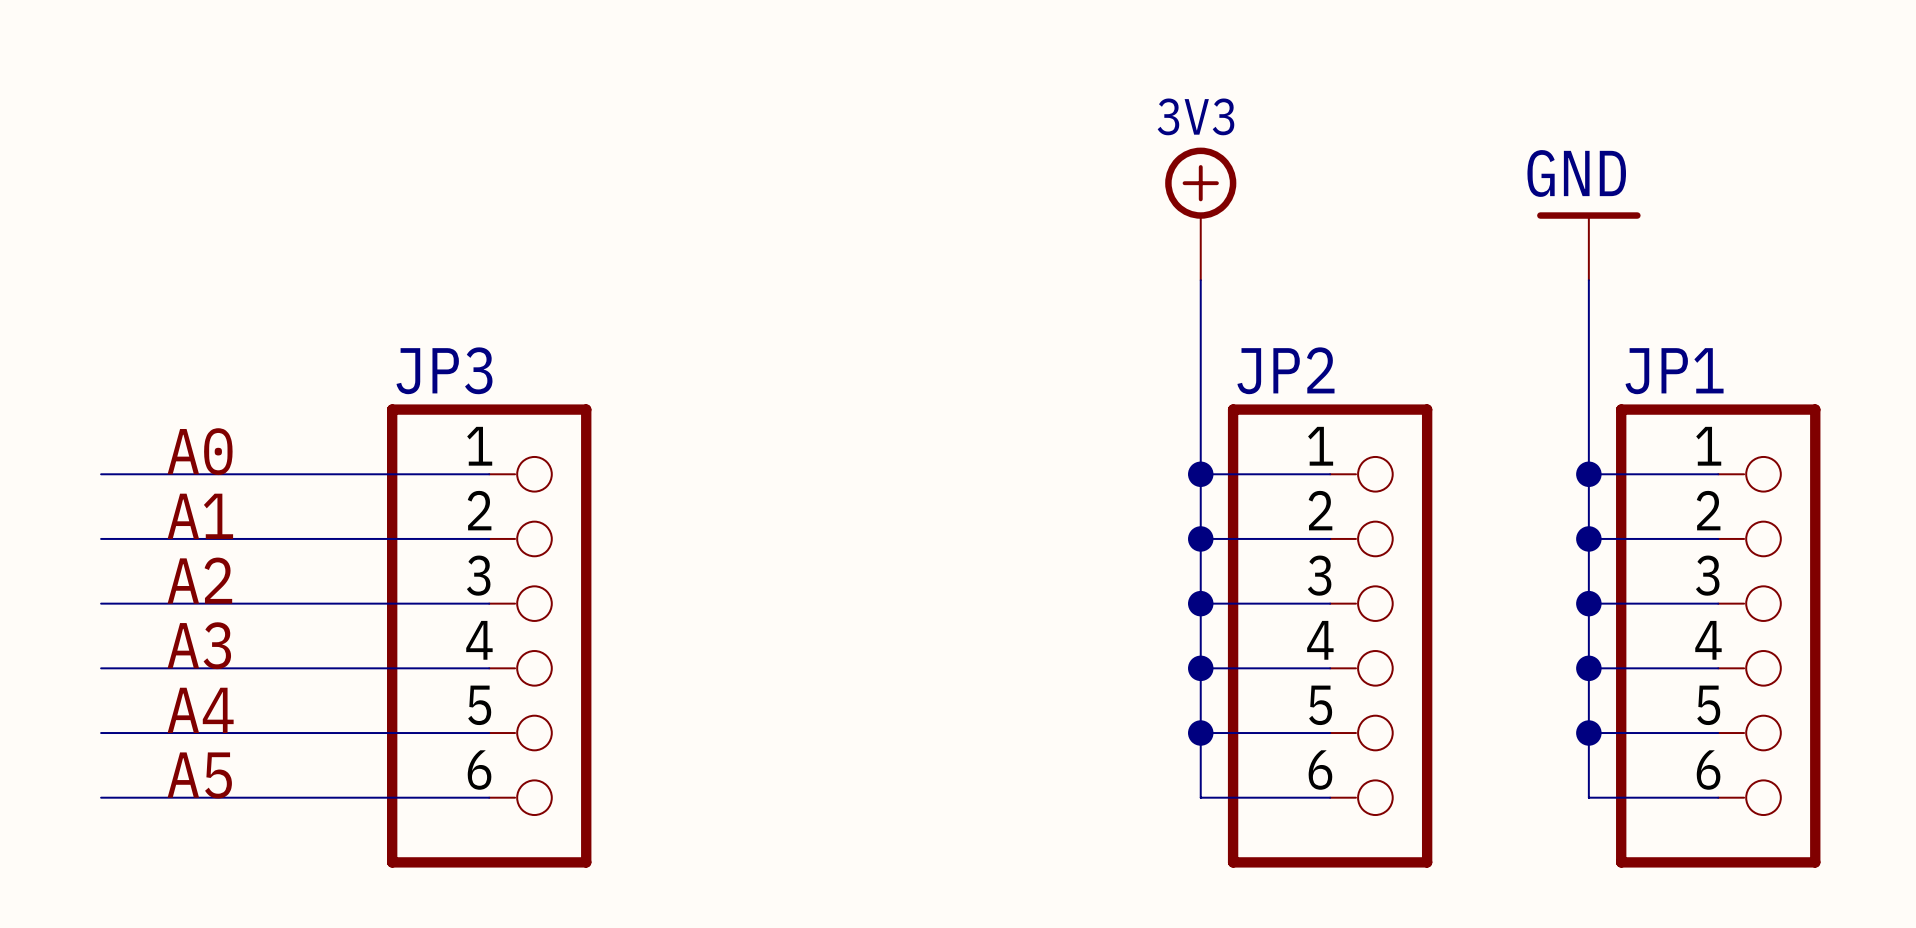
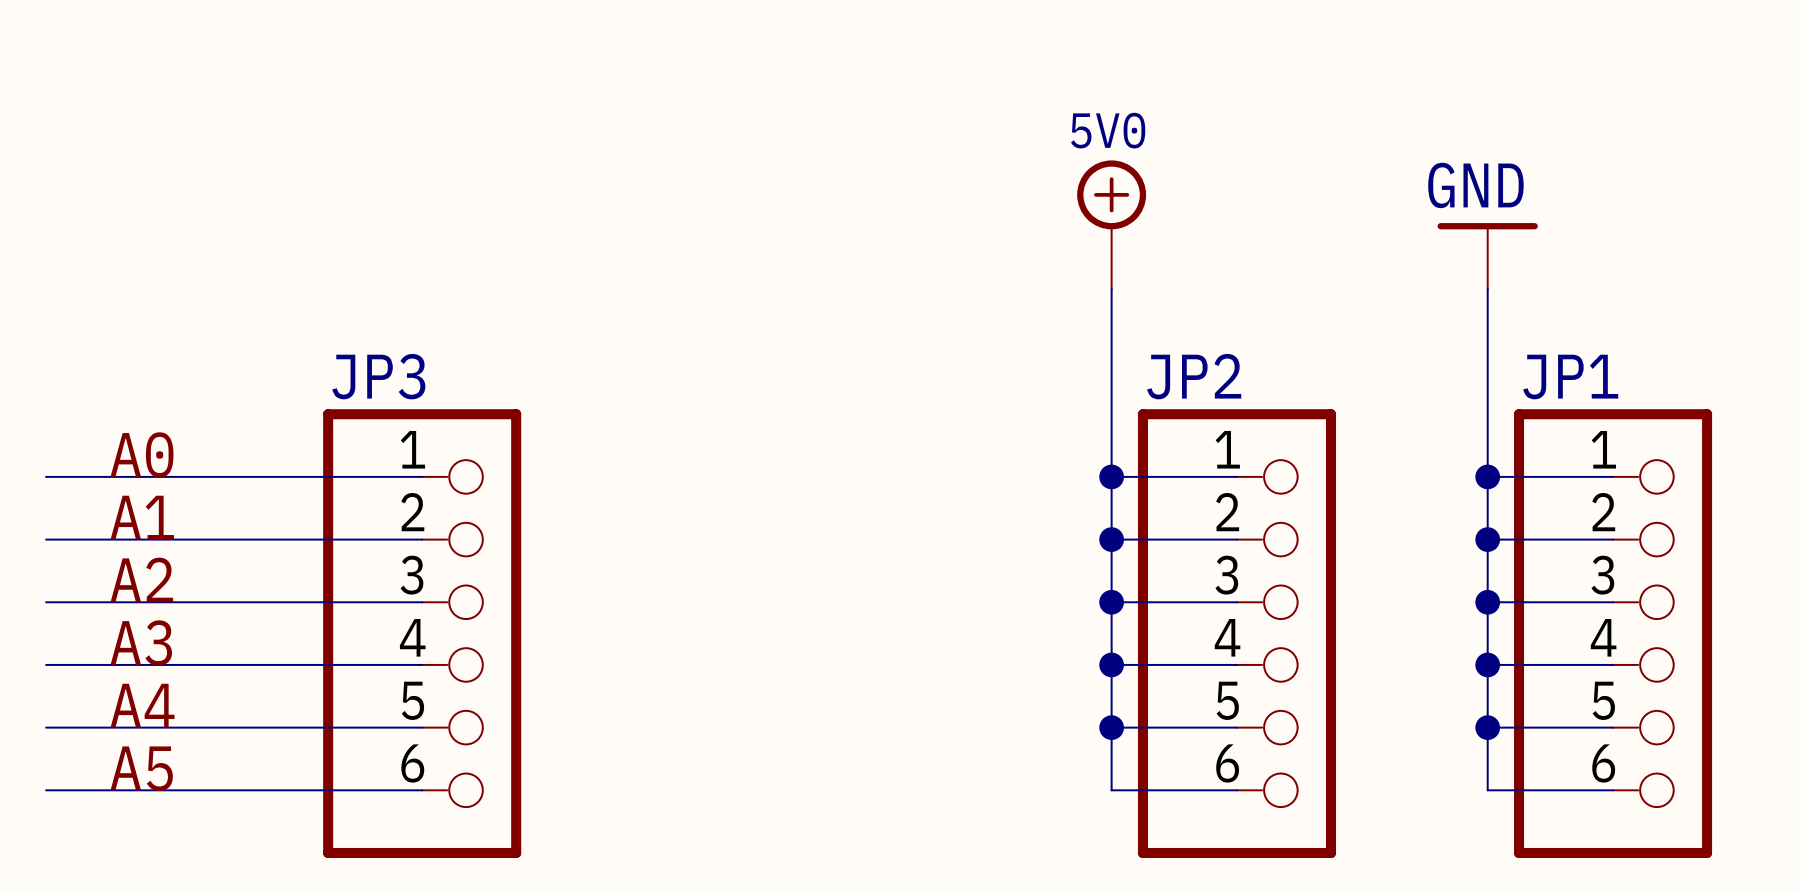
power symbol: 3V3 (1200, 213) -> 5V0 (1111, 224)

